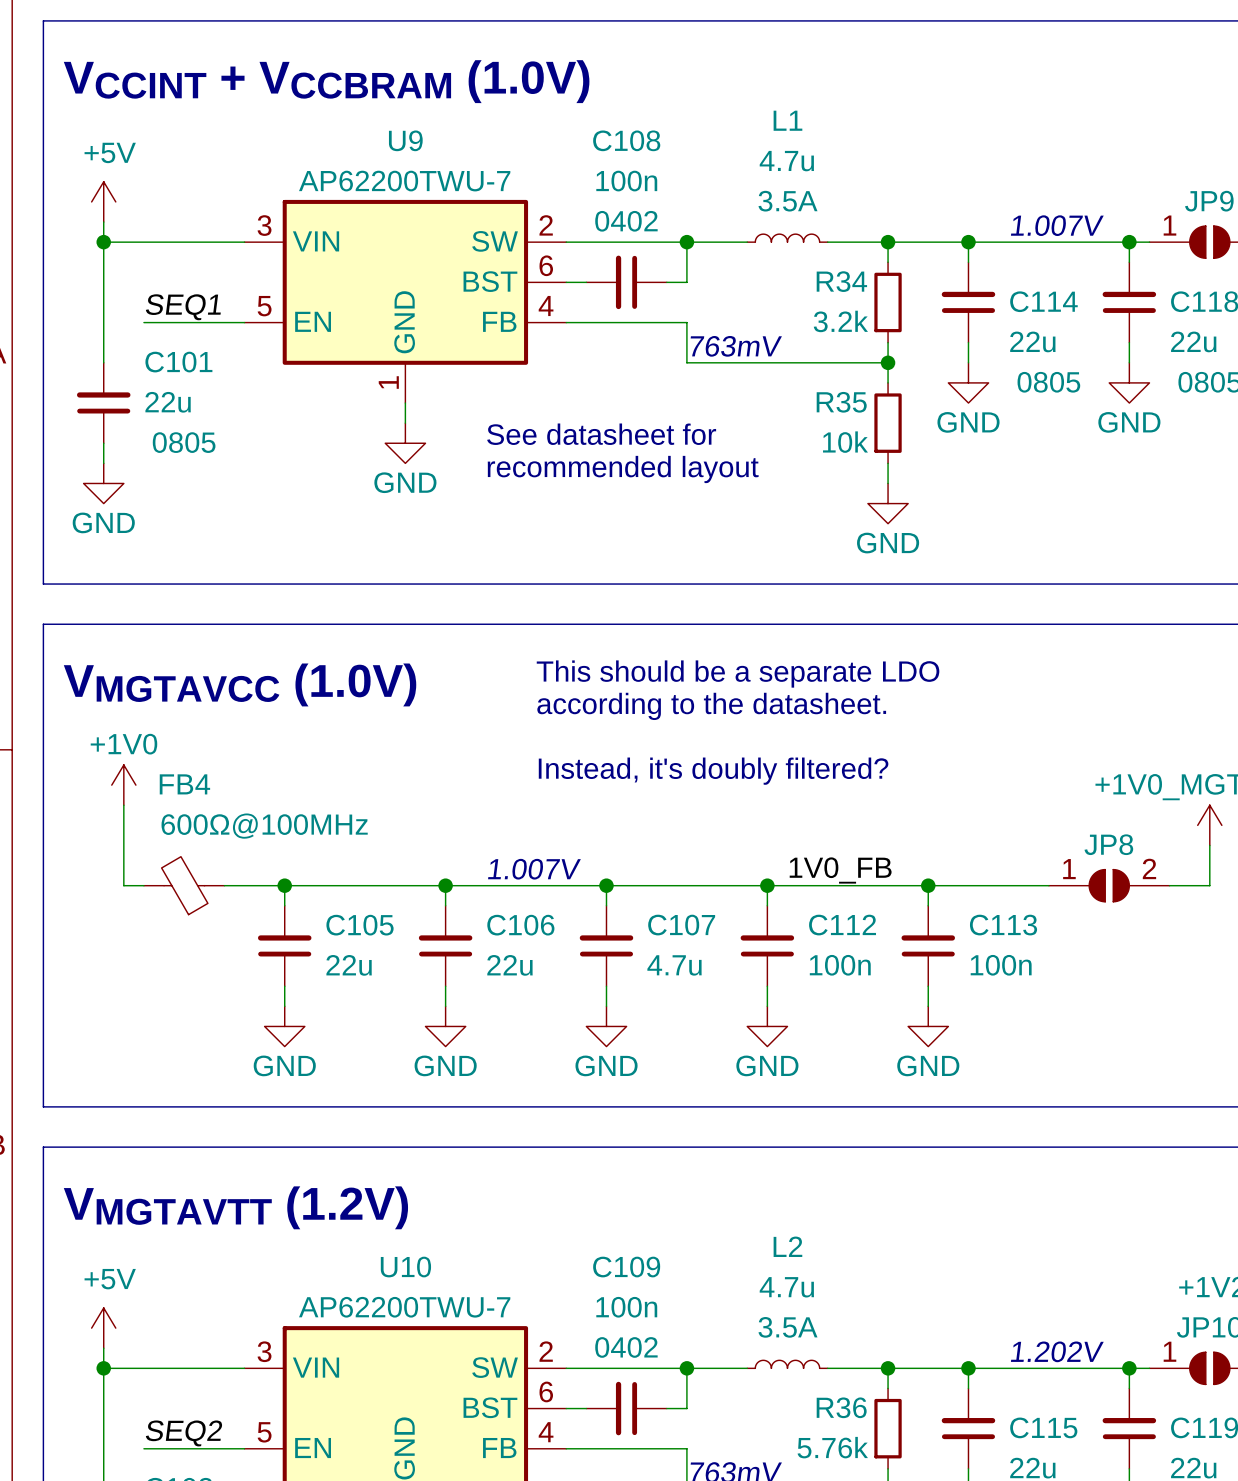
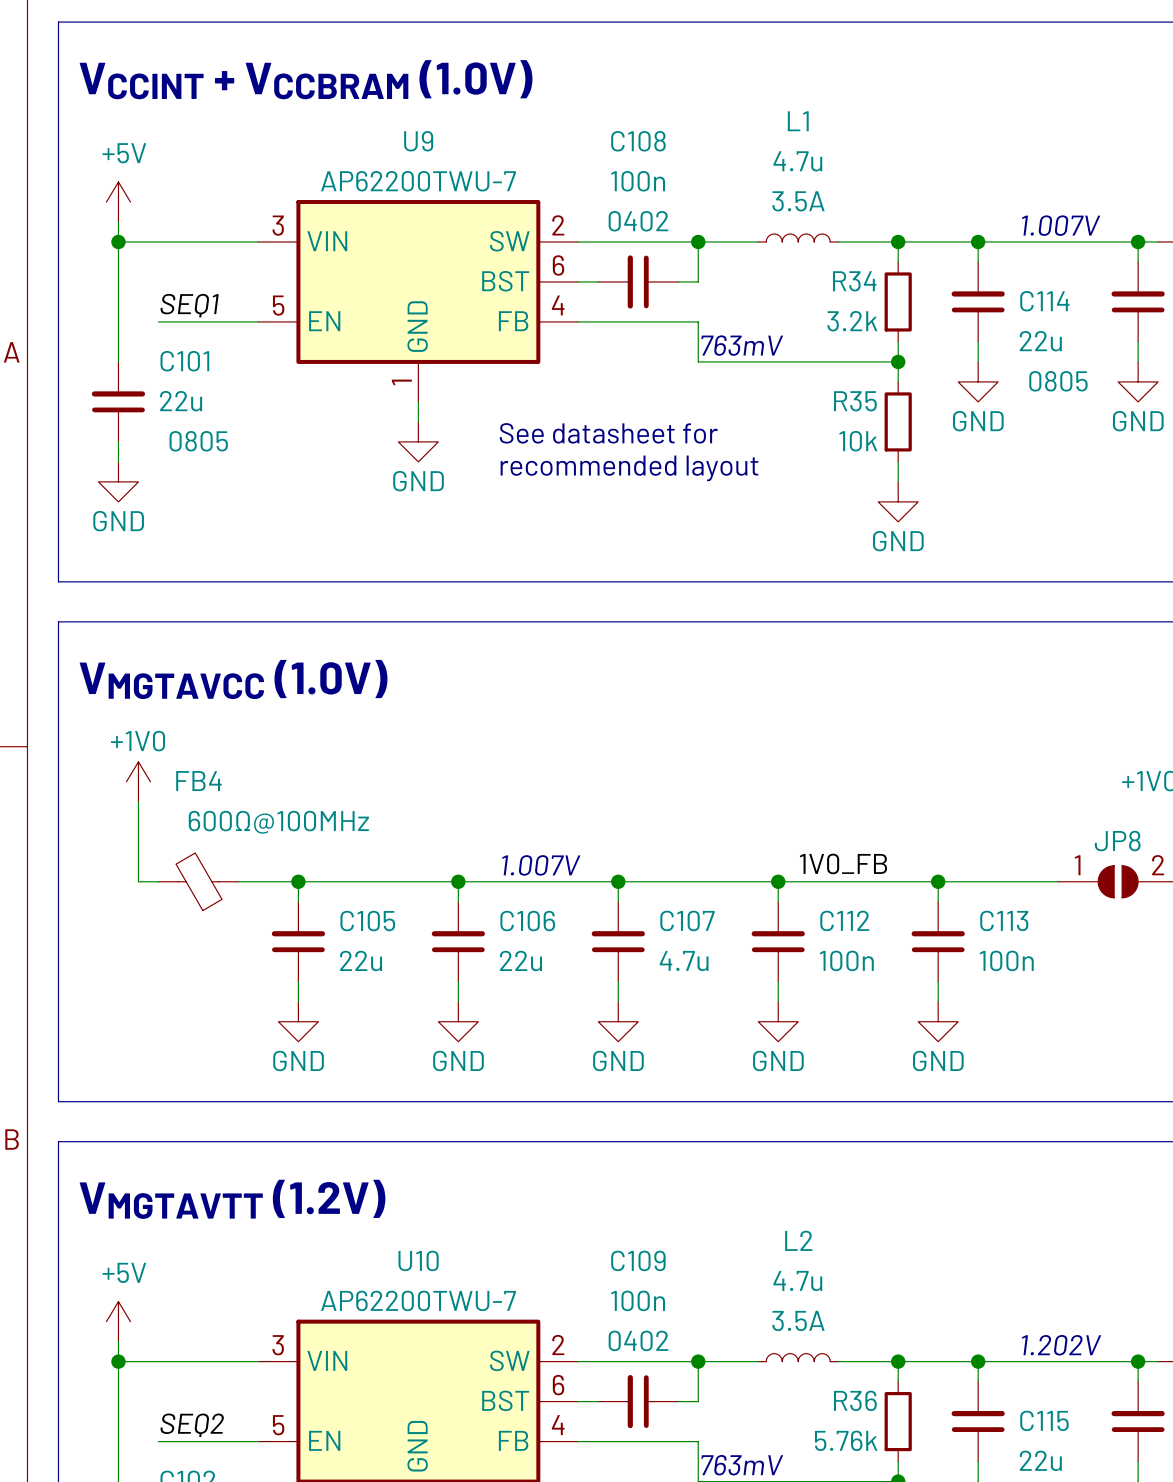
text: This should be a separate LDO (738, 674) -> none
text: according to the datasheet. (711, 706) -> none
text: Instead, it's doubly filtered? (713, 771) -> none

